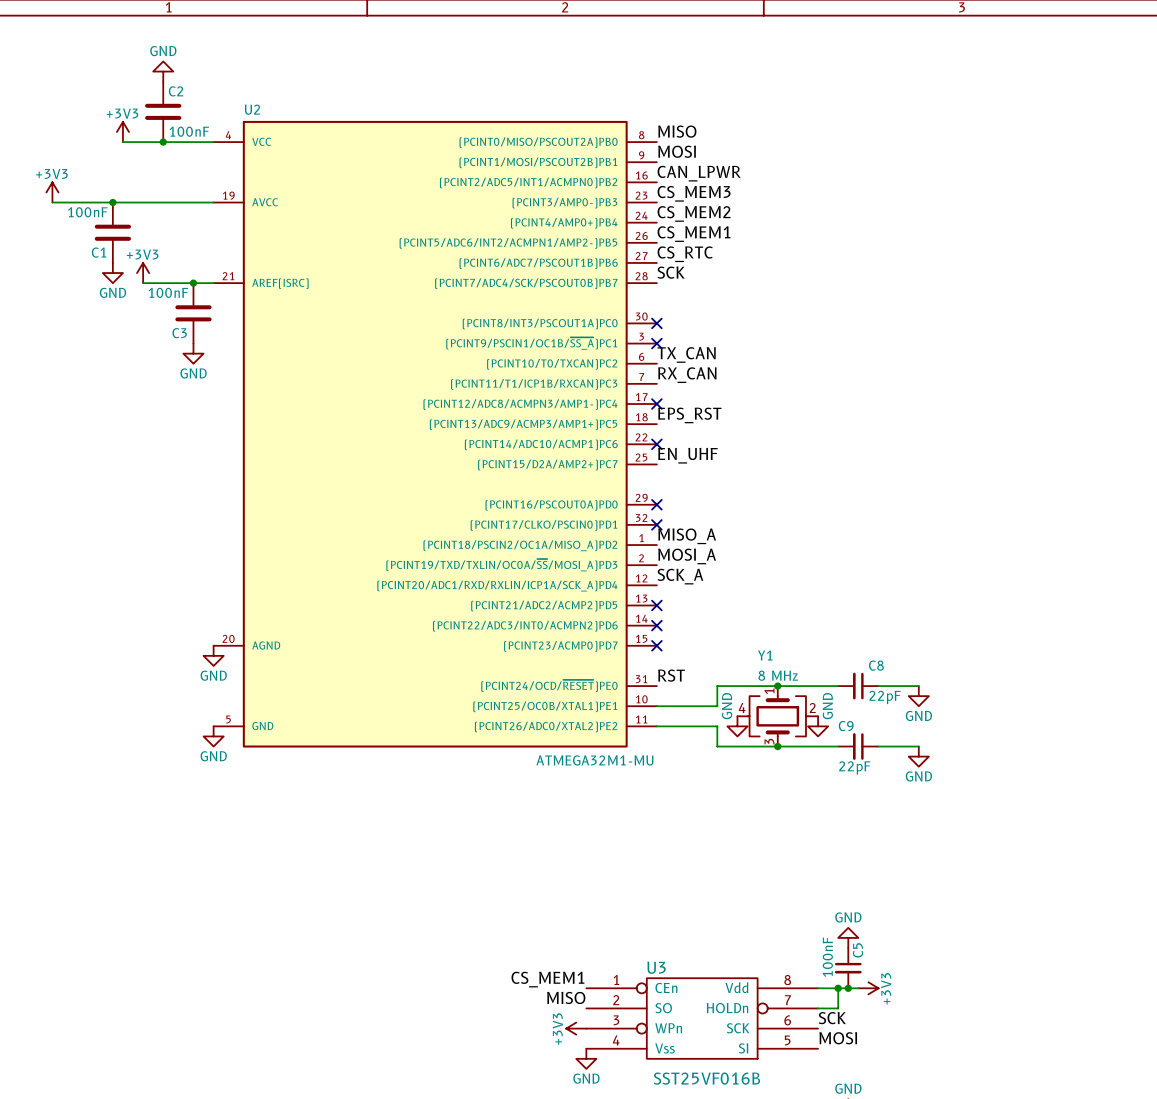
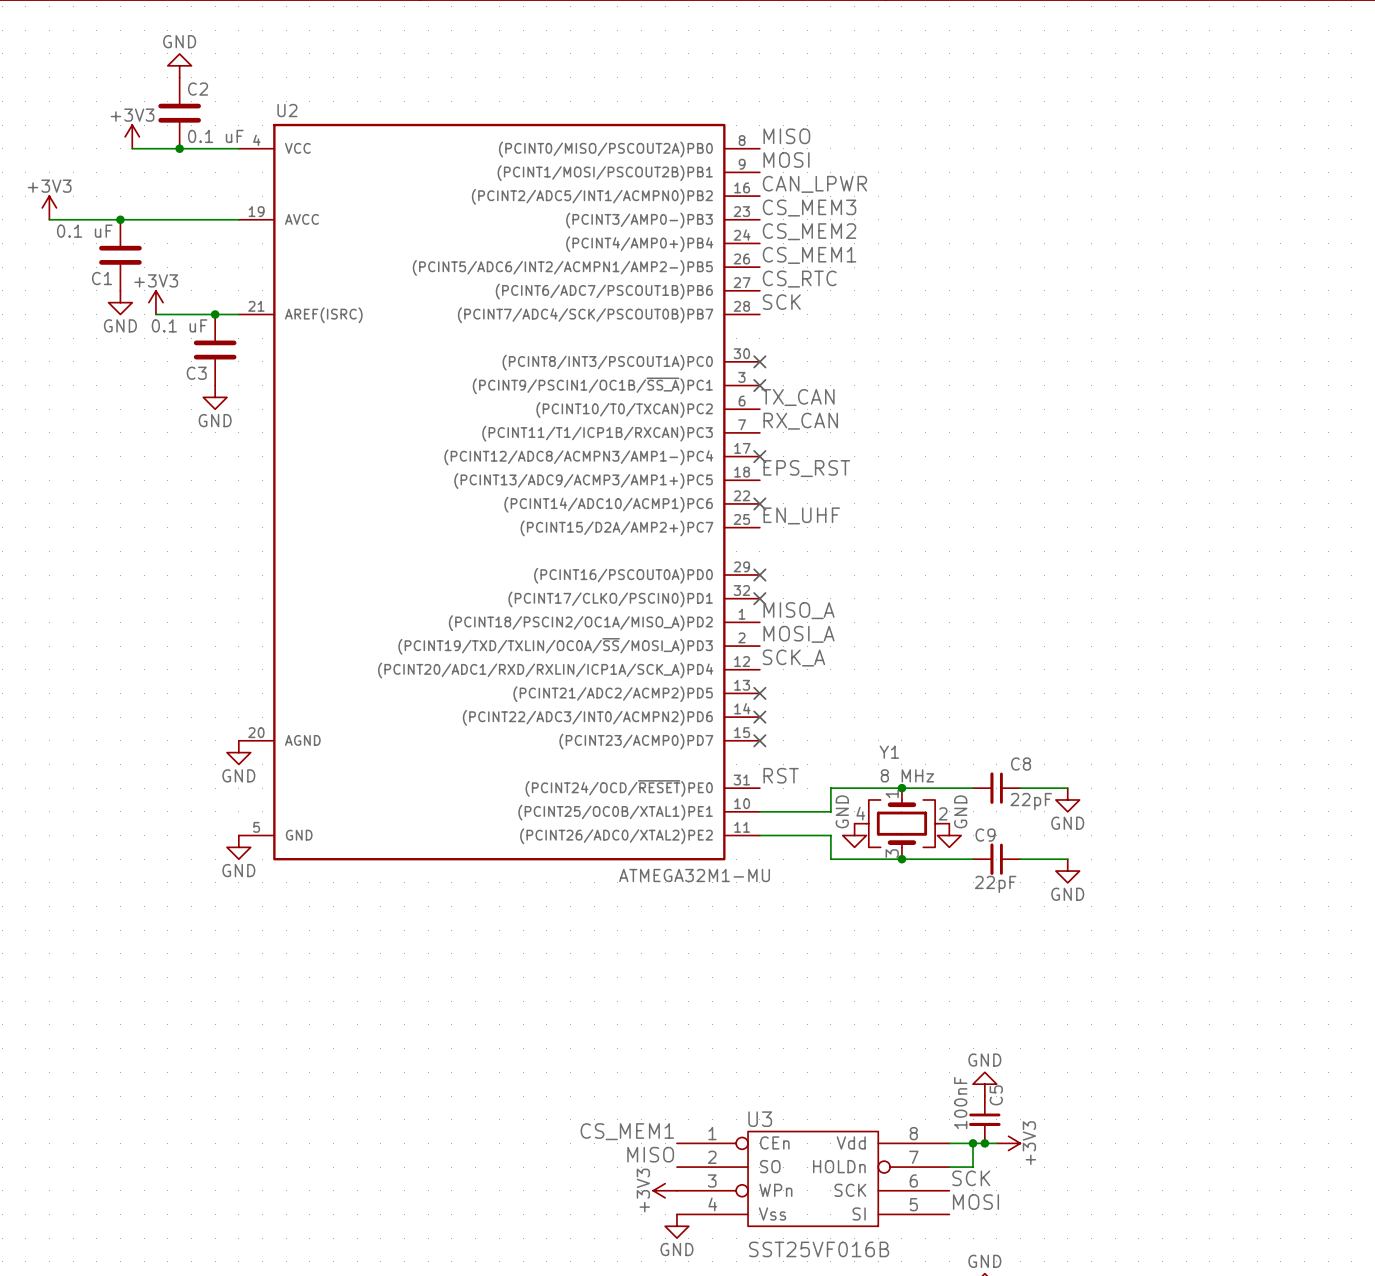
C2 value: 100nF (189, 131) -> 0.1 uF (215, 136)
C1 value: 100nF (87, 212) -> 0.1 uF (84, 231)
C3 value: 100nF (168, 292) -> 0.1 uF (179, 325)

